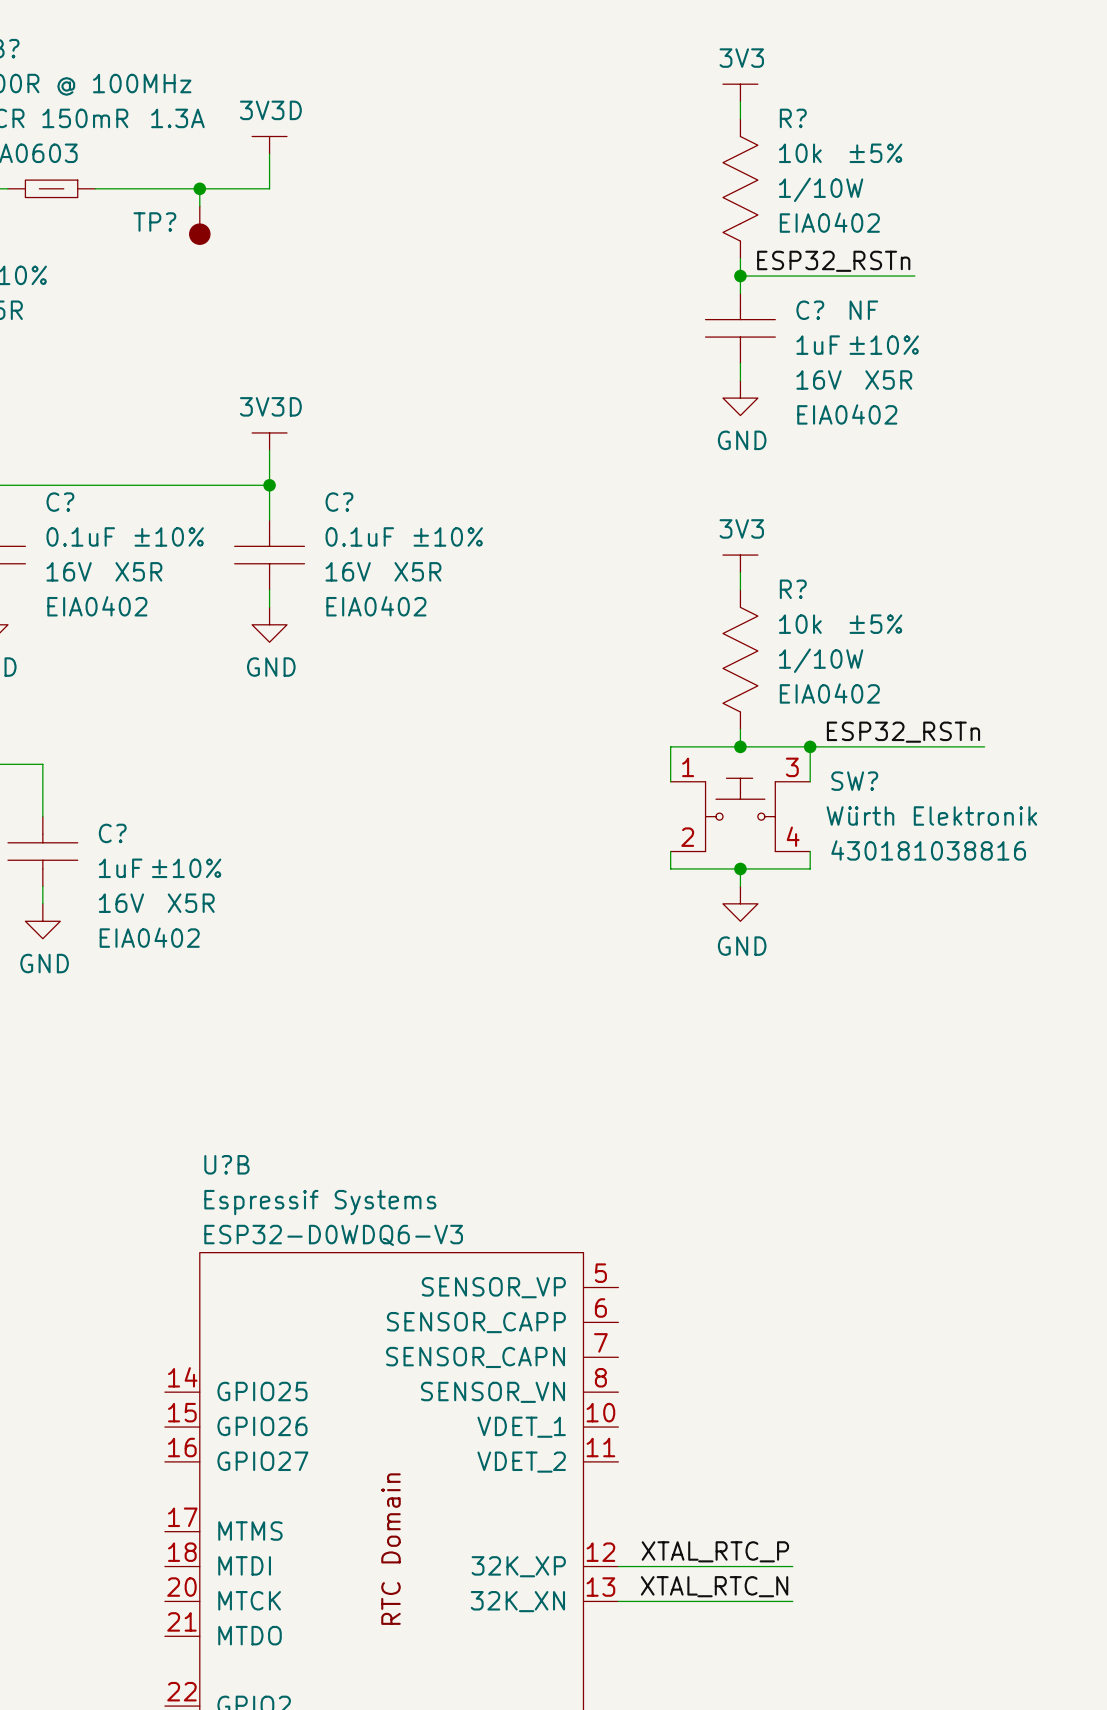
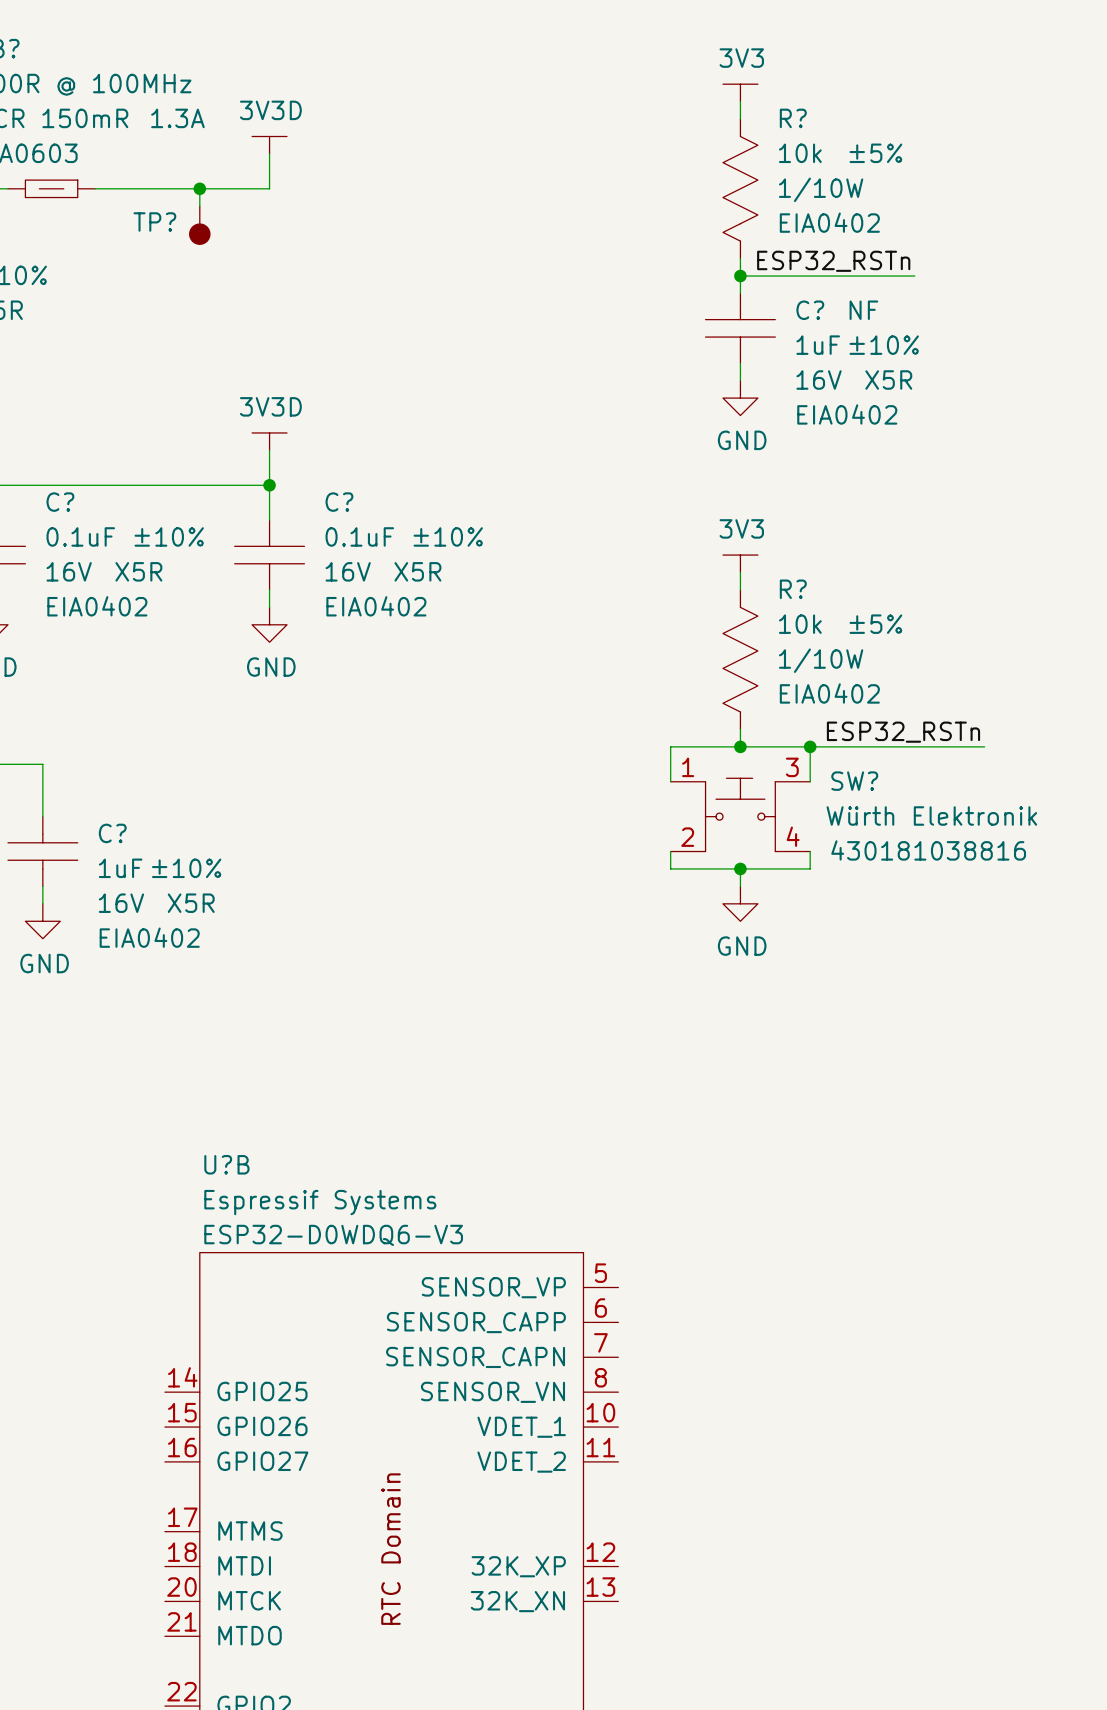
label: XTAL_RTC_P (715, 1551) -> none
wire: (618, 1566) (792, 1566) -> none
label: XTAL_RTC_N (714, 1586) -> none
wire: (618, 1601) (792, 1601) -> none

